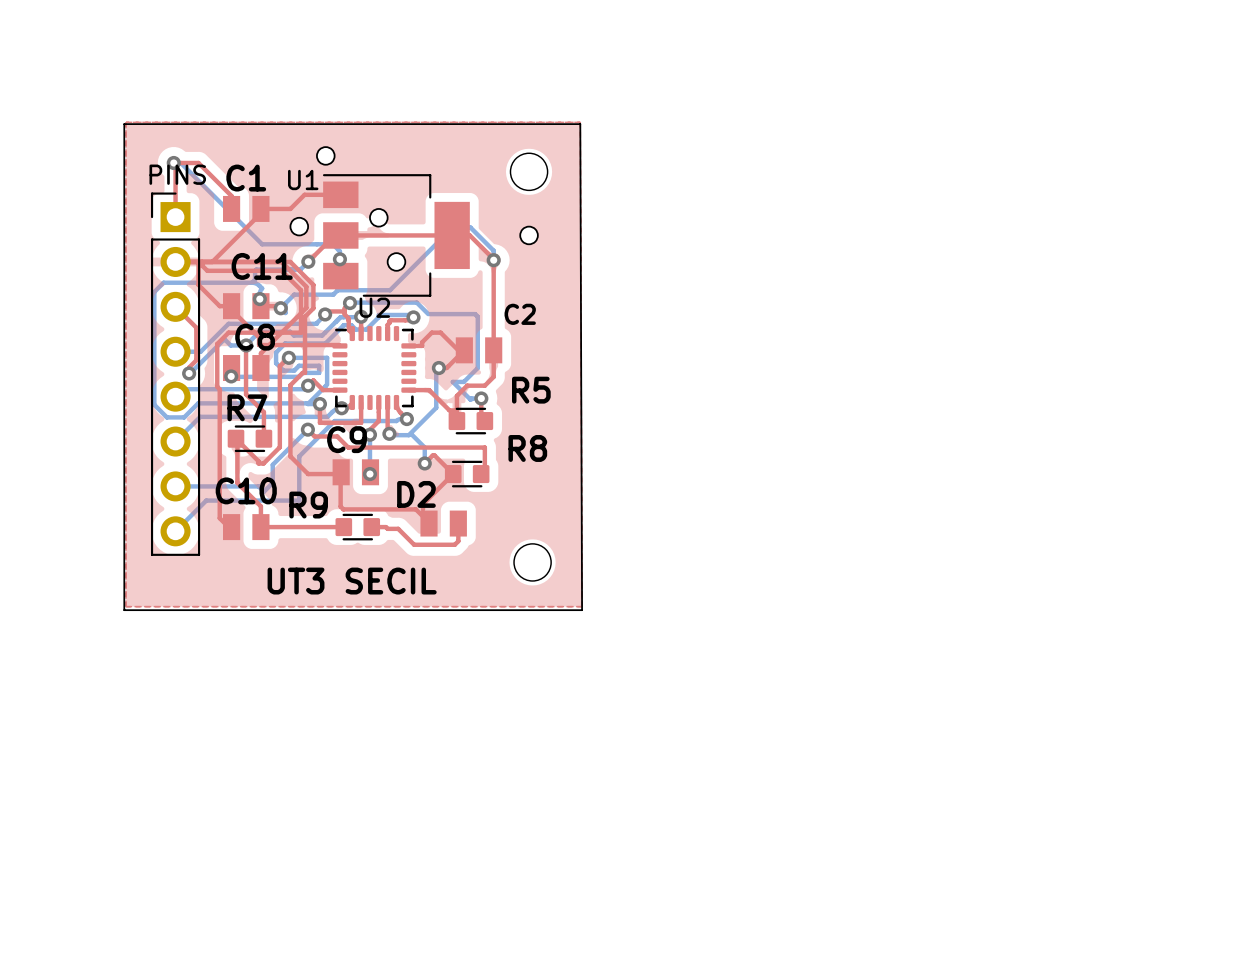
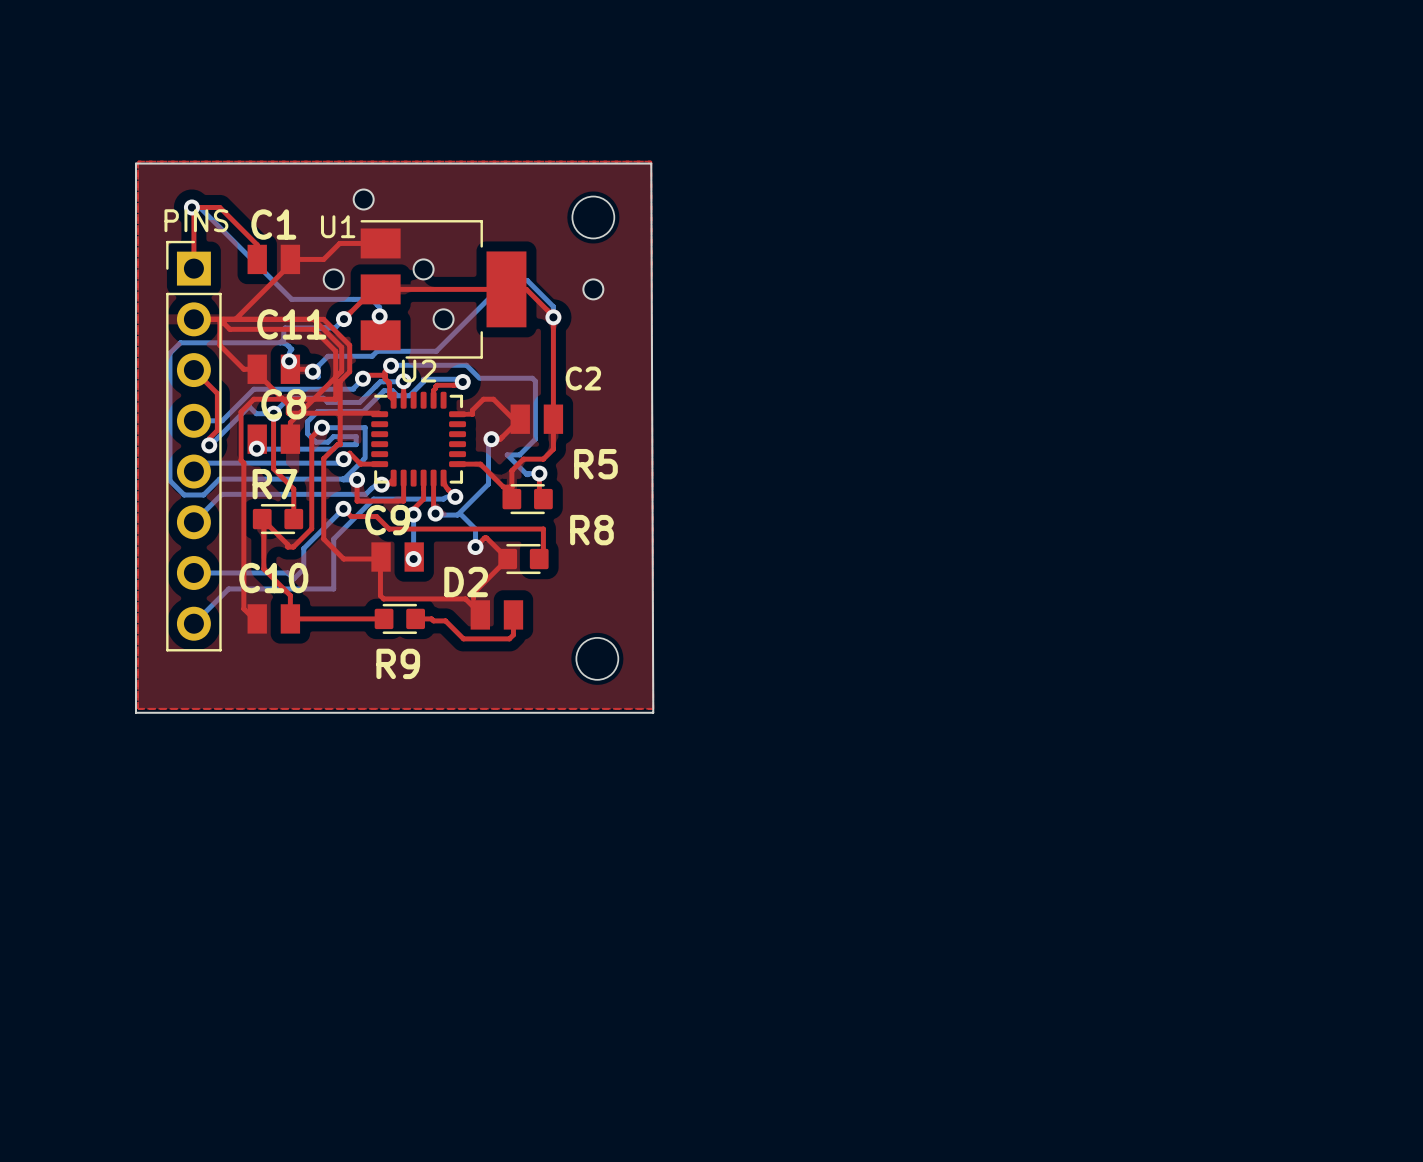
R9 name position: R9 (308, 505) -> R9 (398, 663)
text: UT3 SECIL (352, 581) -> none

